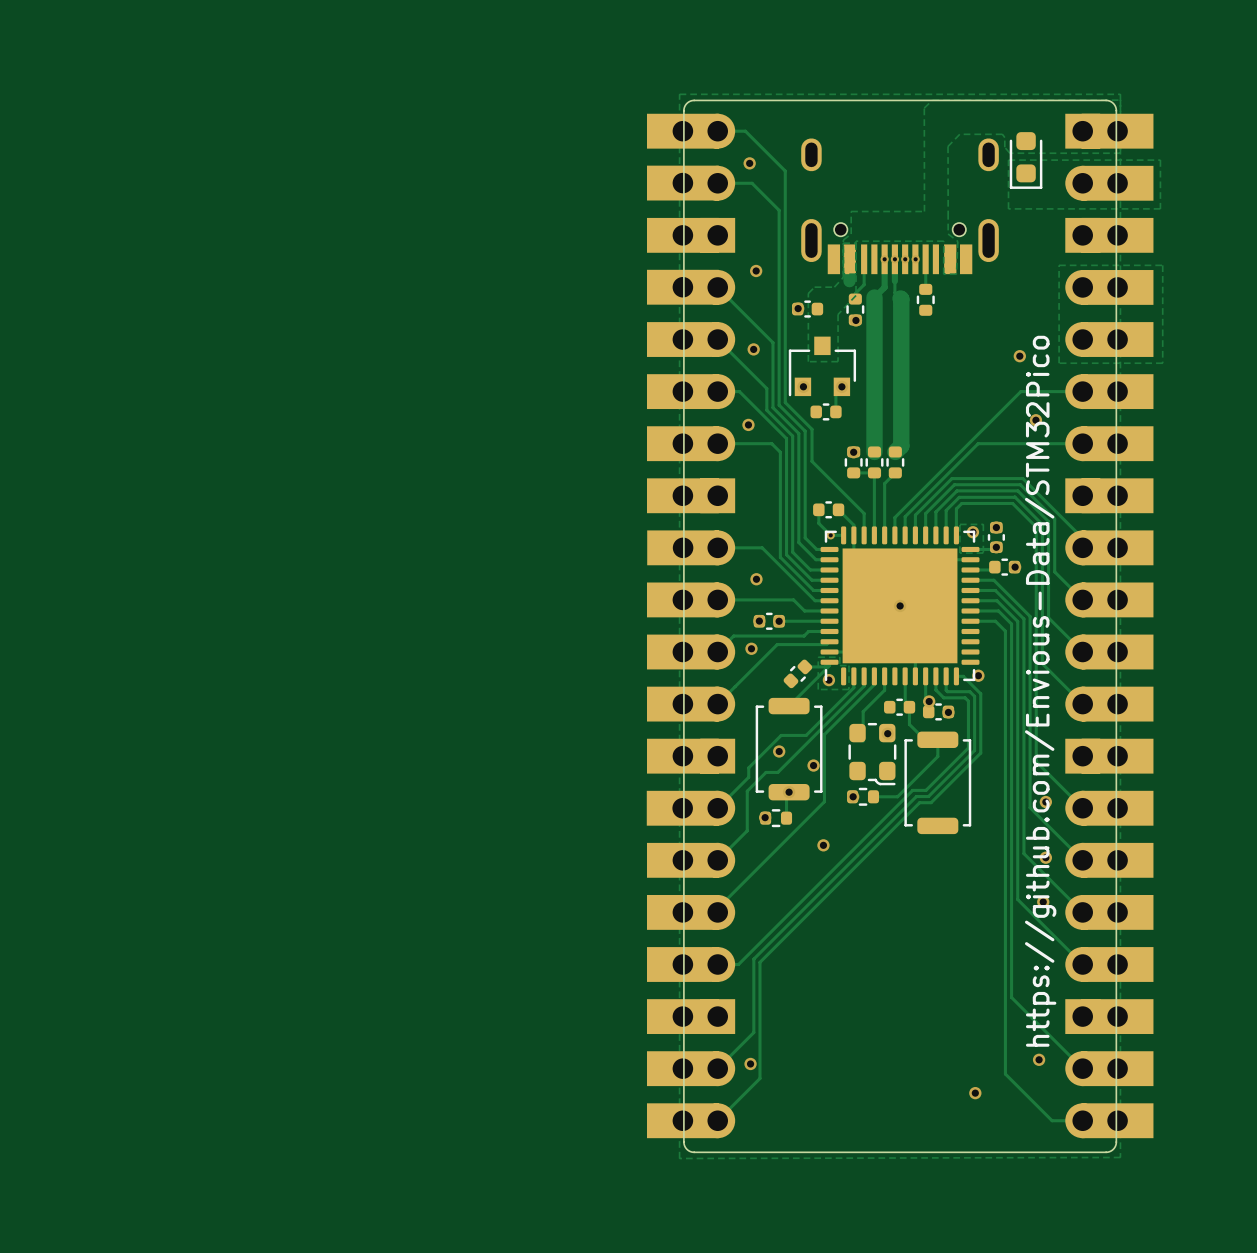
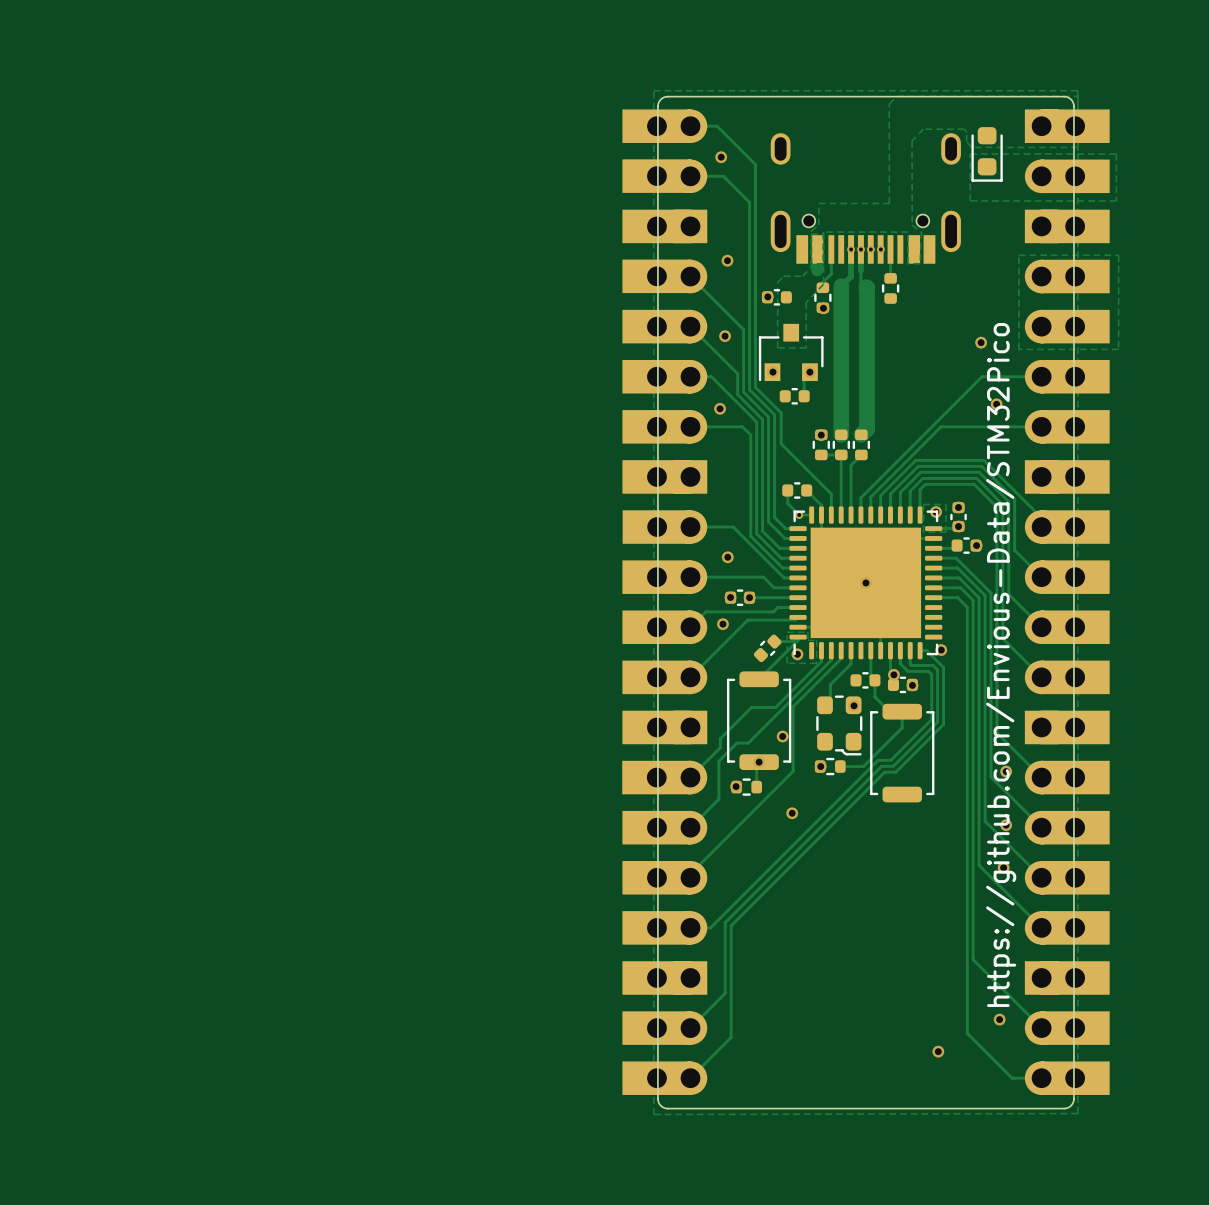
via: (779, 751) -> none
via: (750, 1063) -> none

